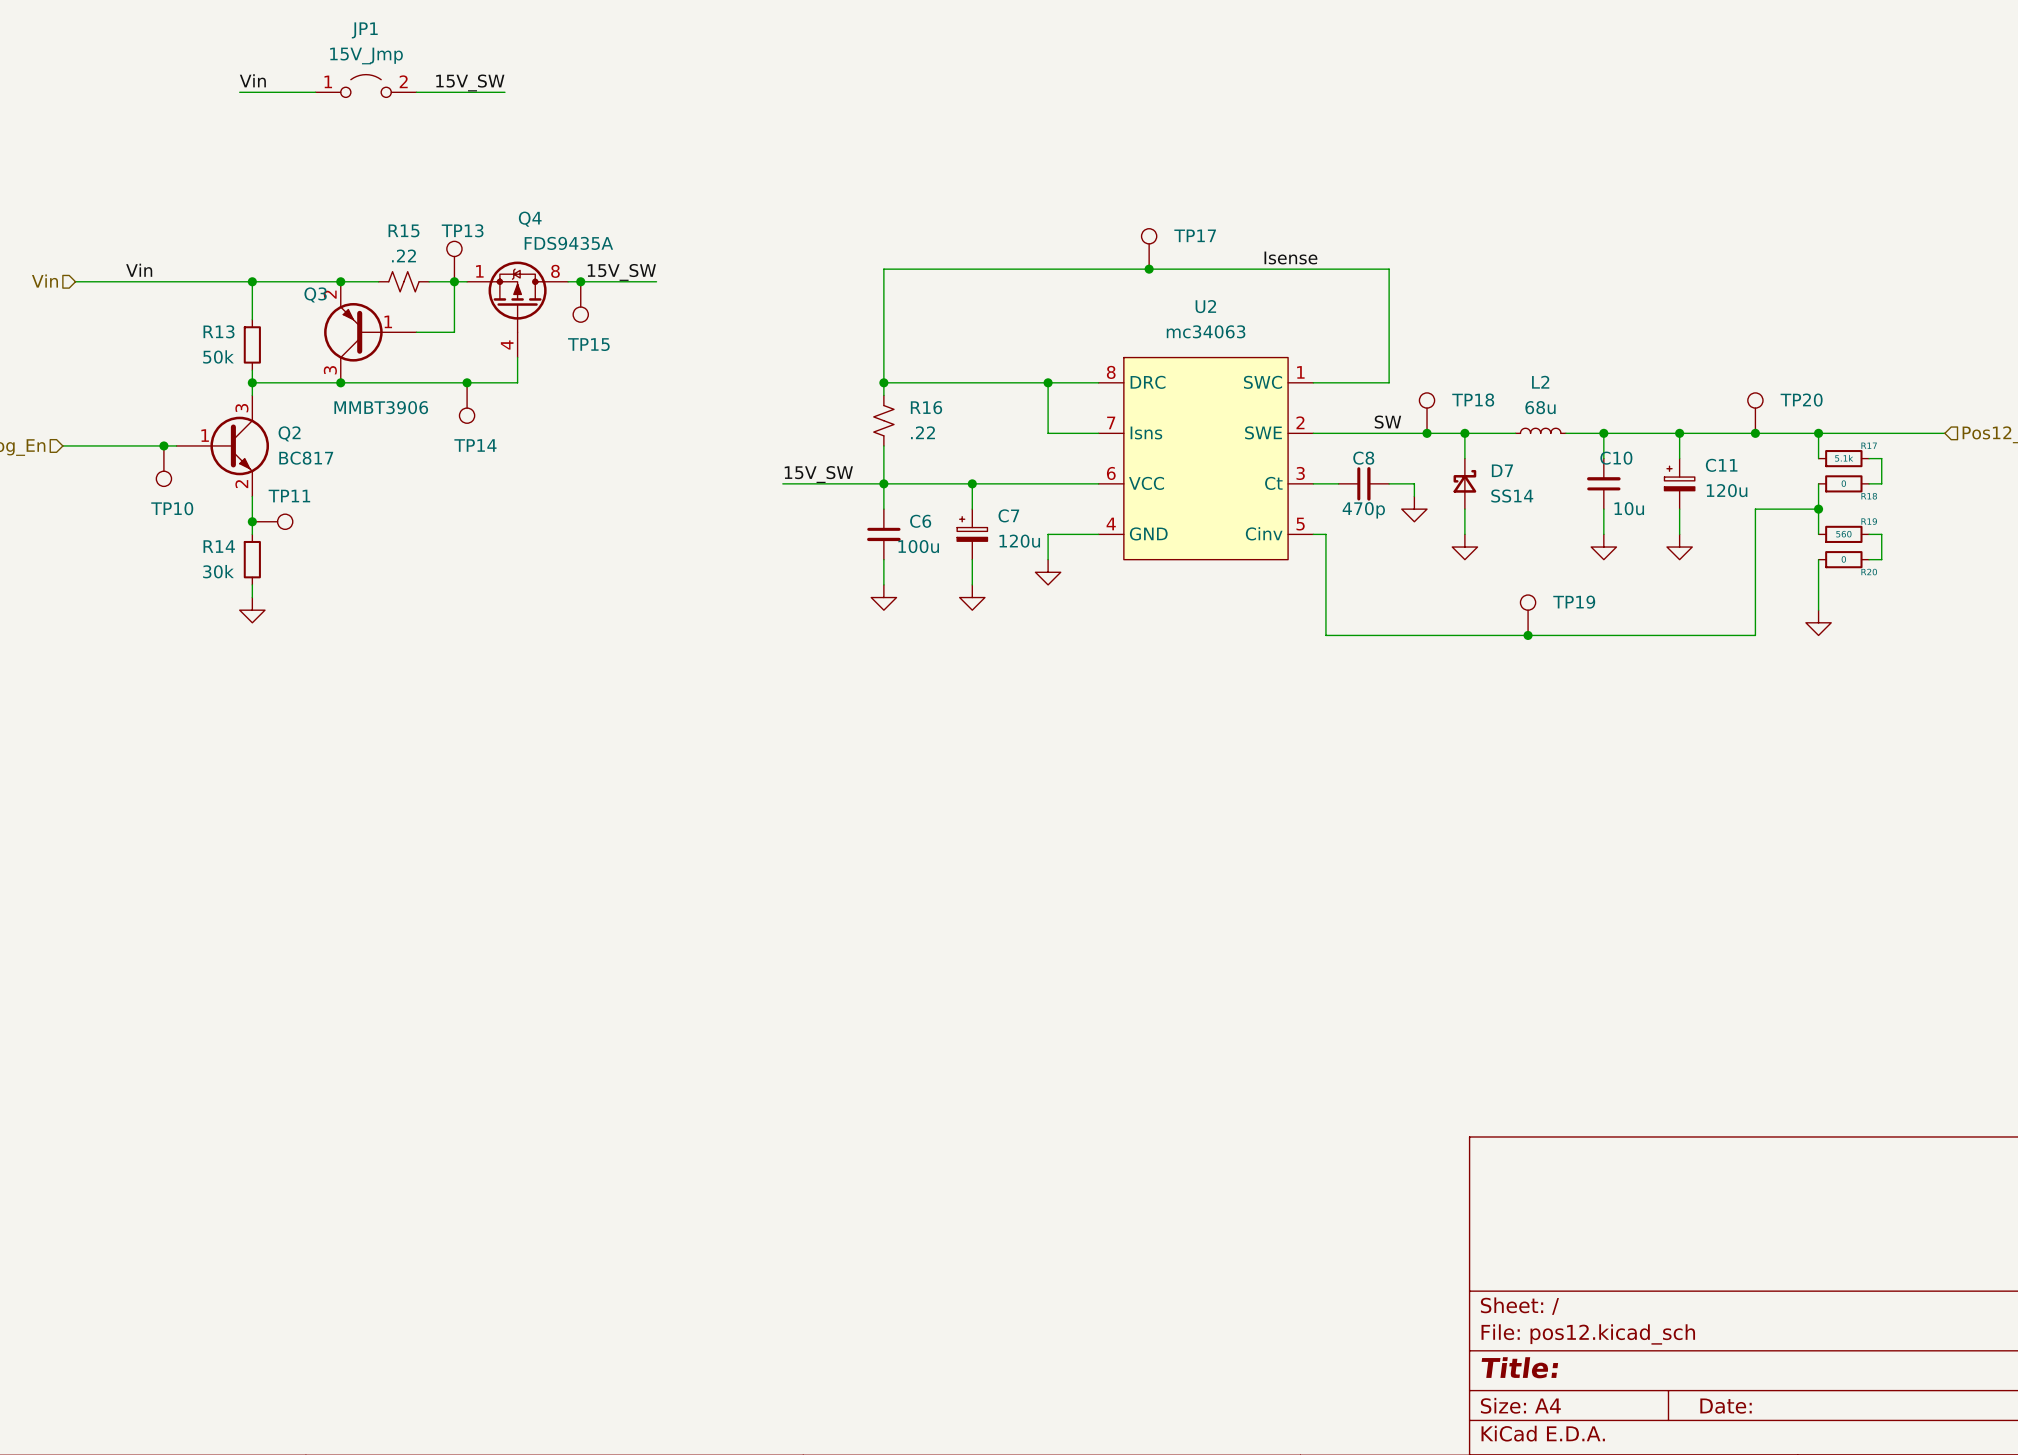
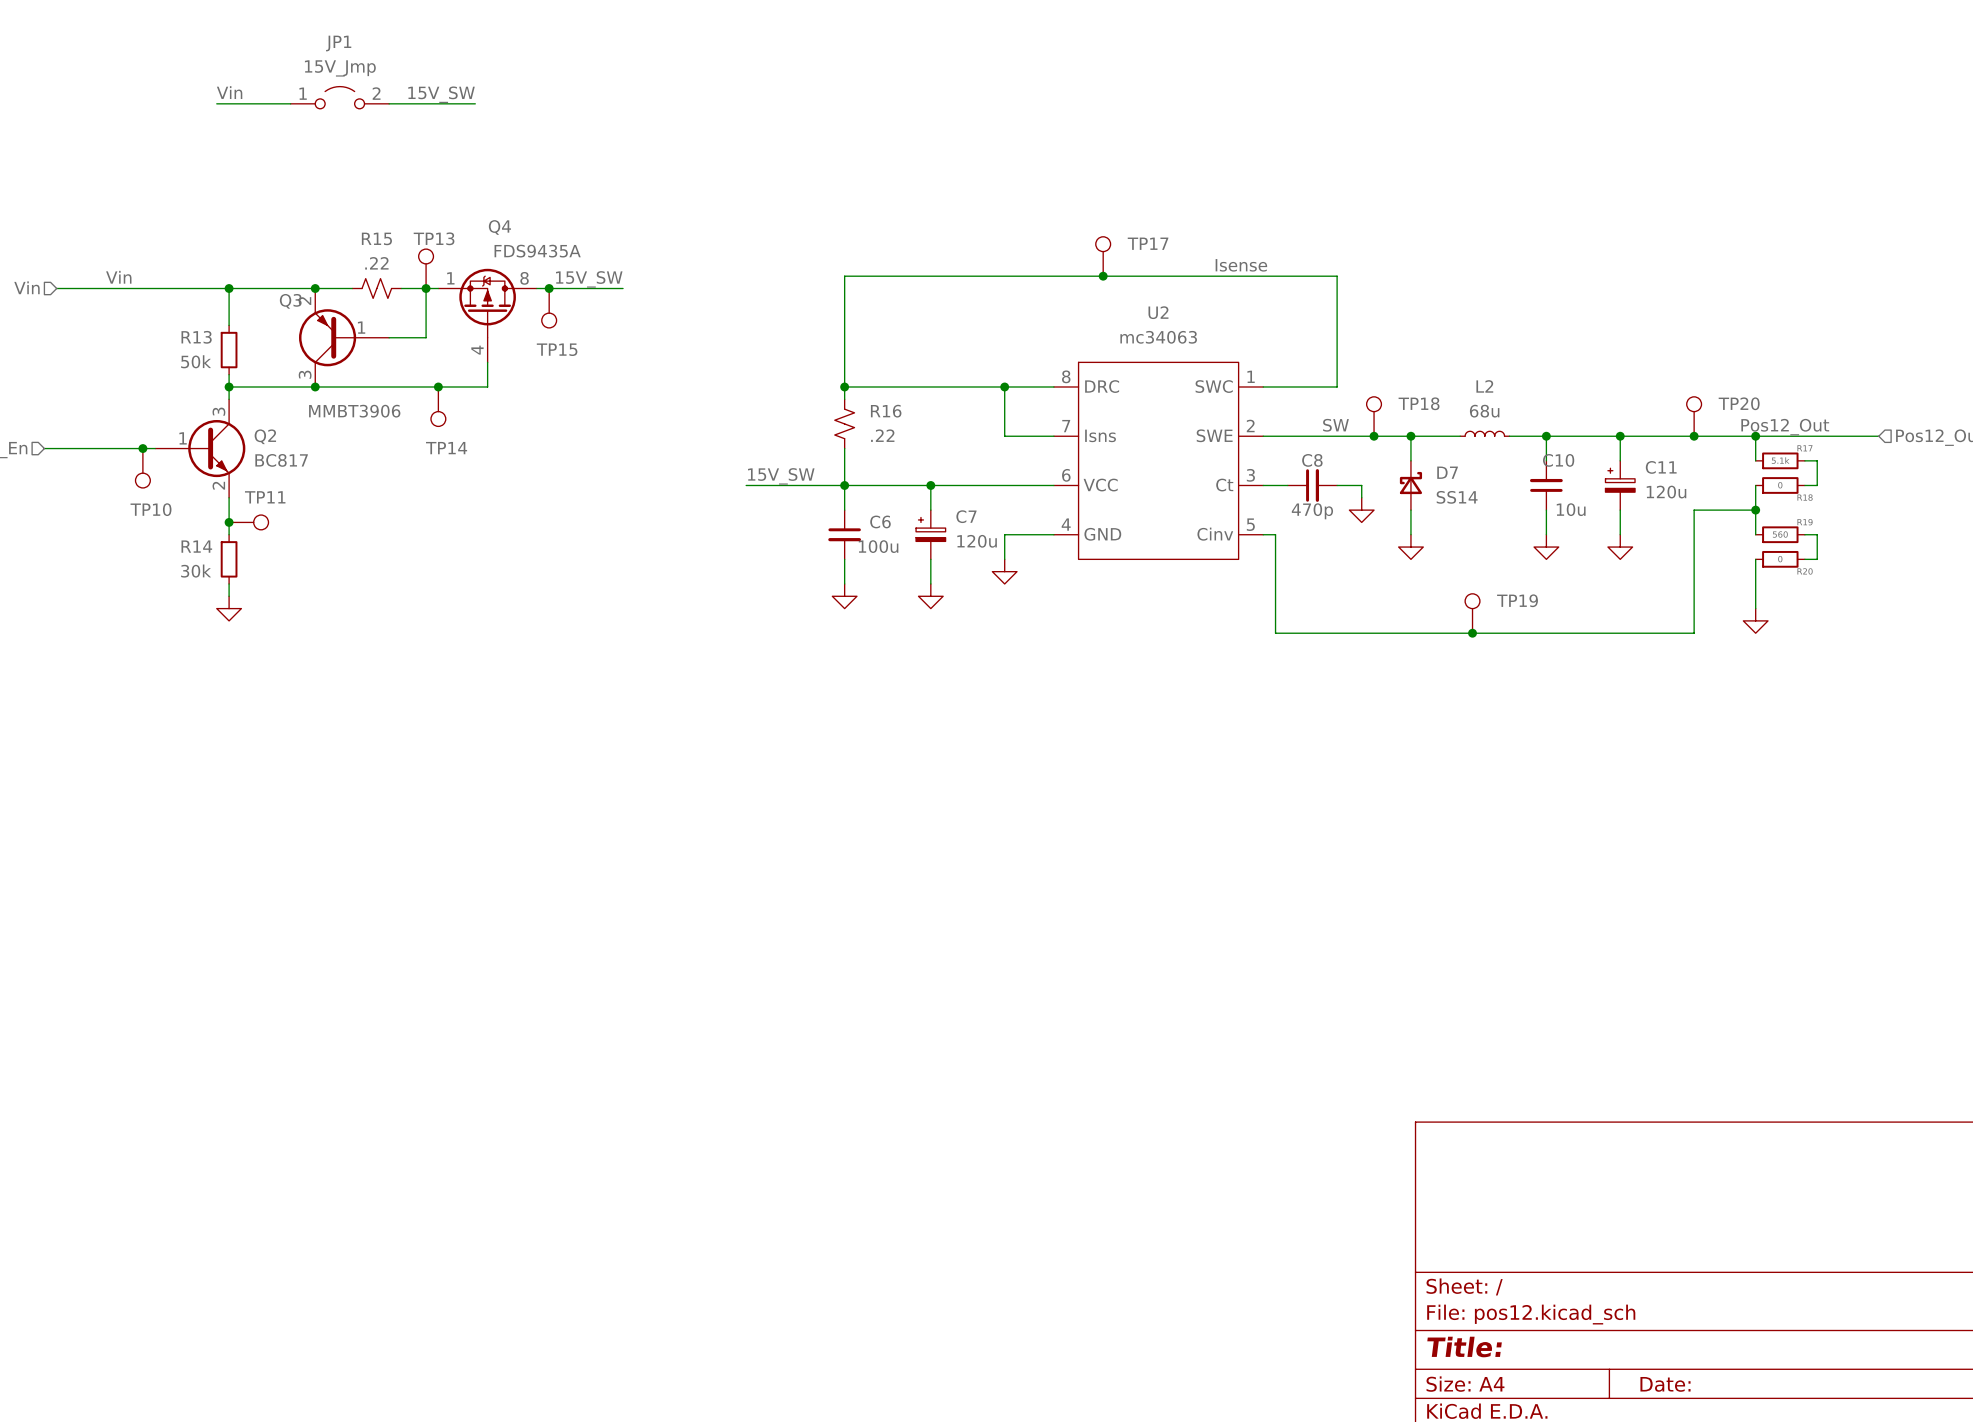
label: none -> Pos12_Out (1785, 427)

